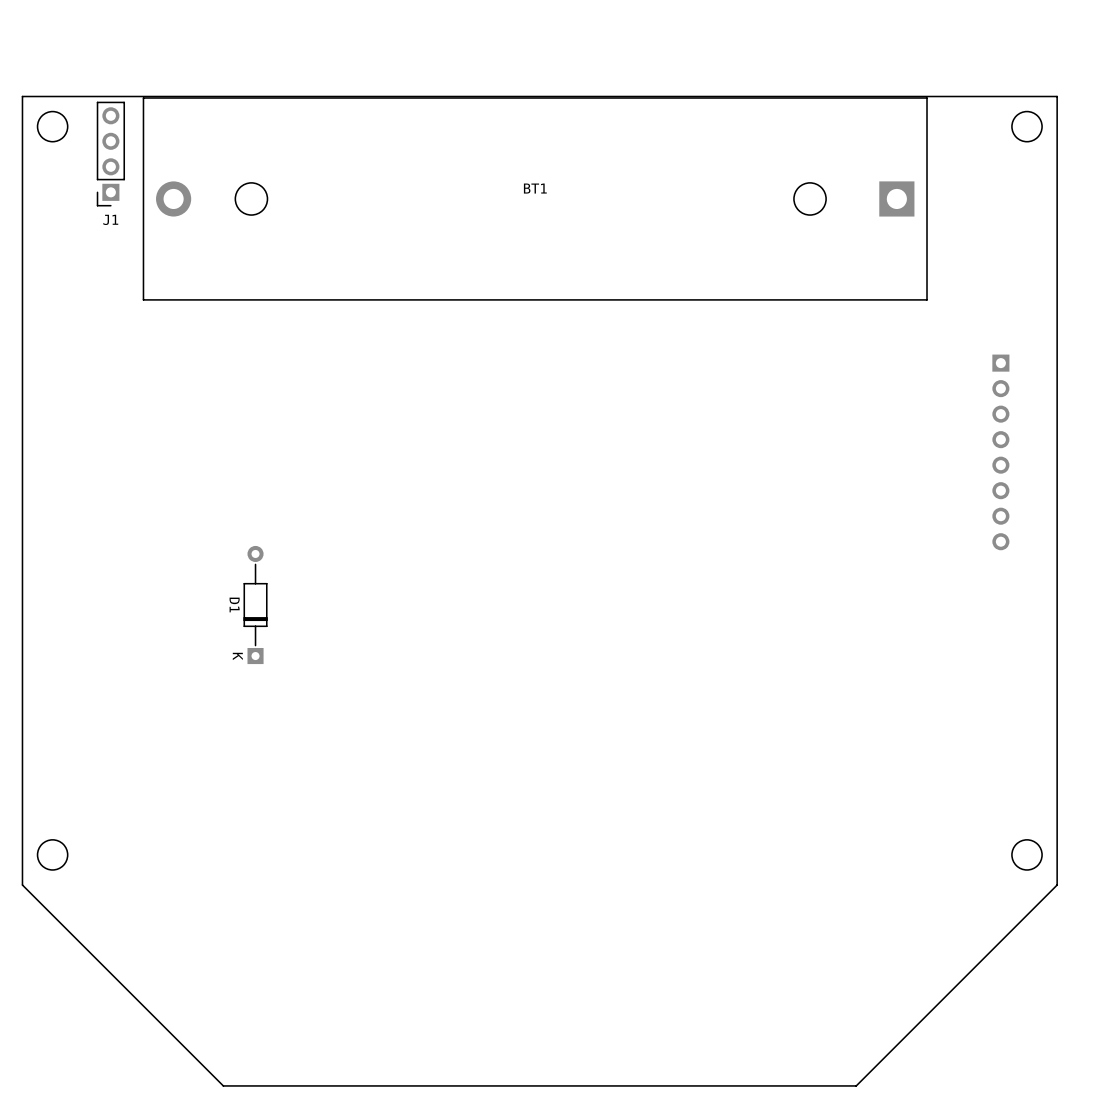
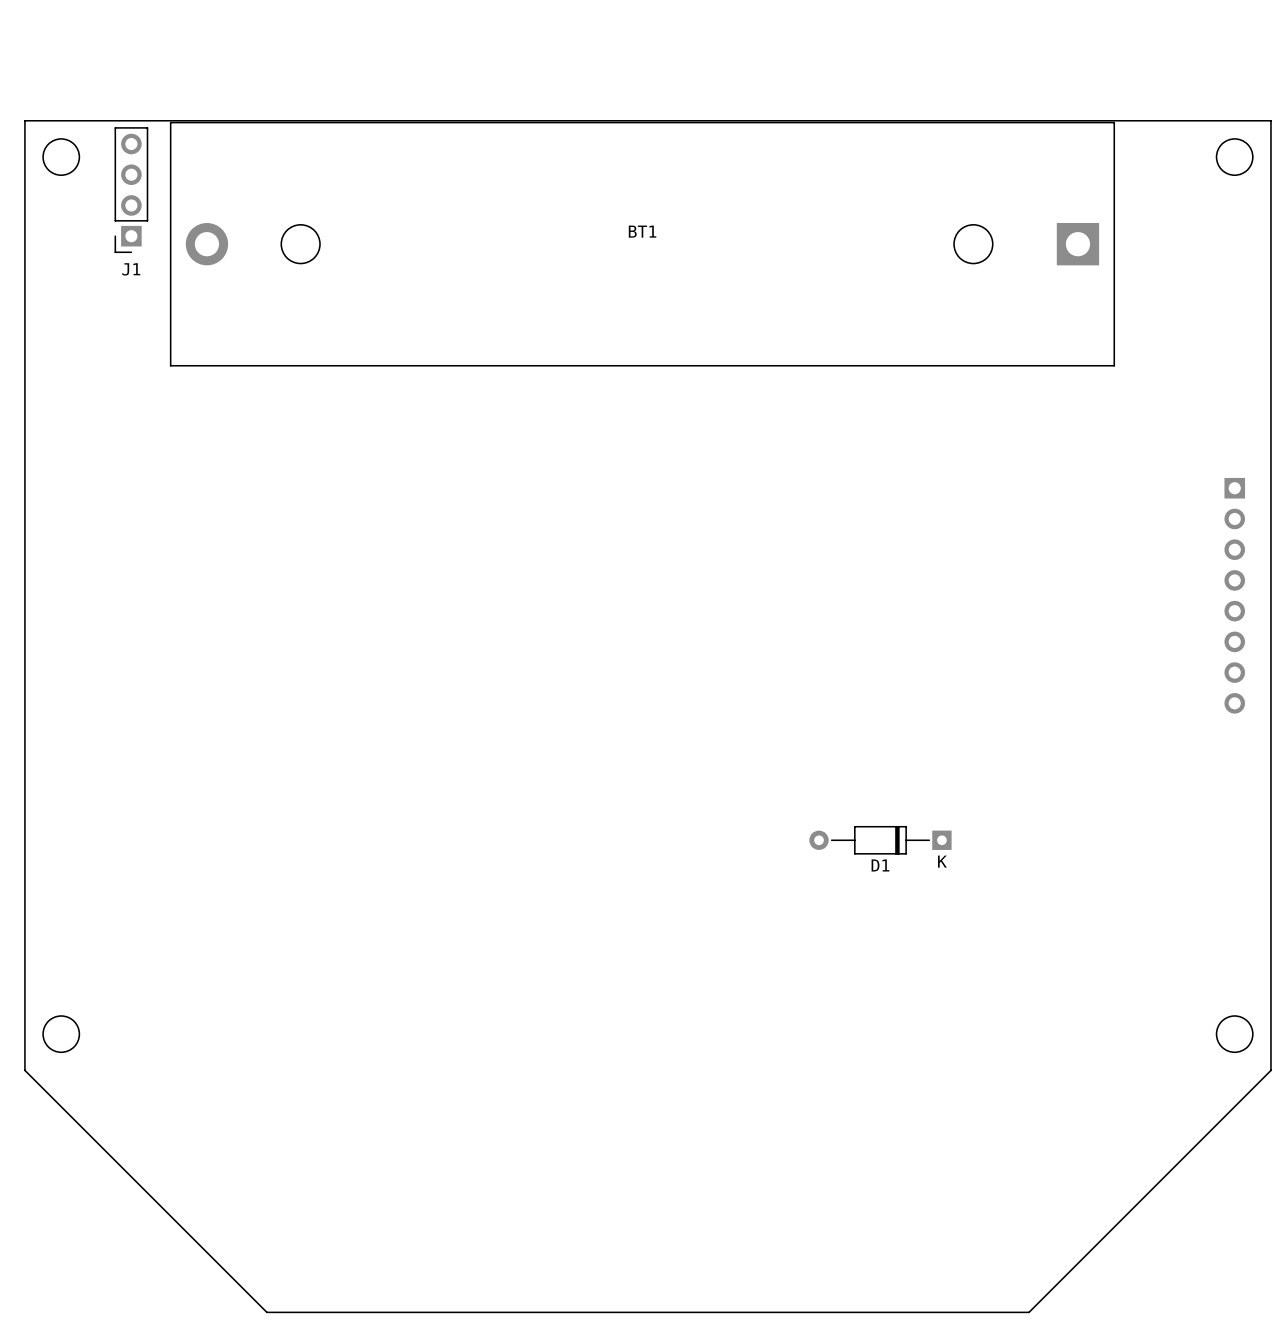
part position: (1000, 452) -> (1234, 595)
D1 rotation: 0° (255, 605) -> 90° counterclockwise (880, 840)
D1 position: (255, 605) -> (880, 840)

